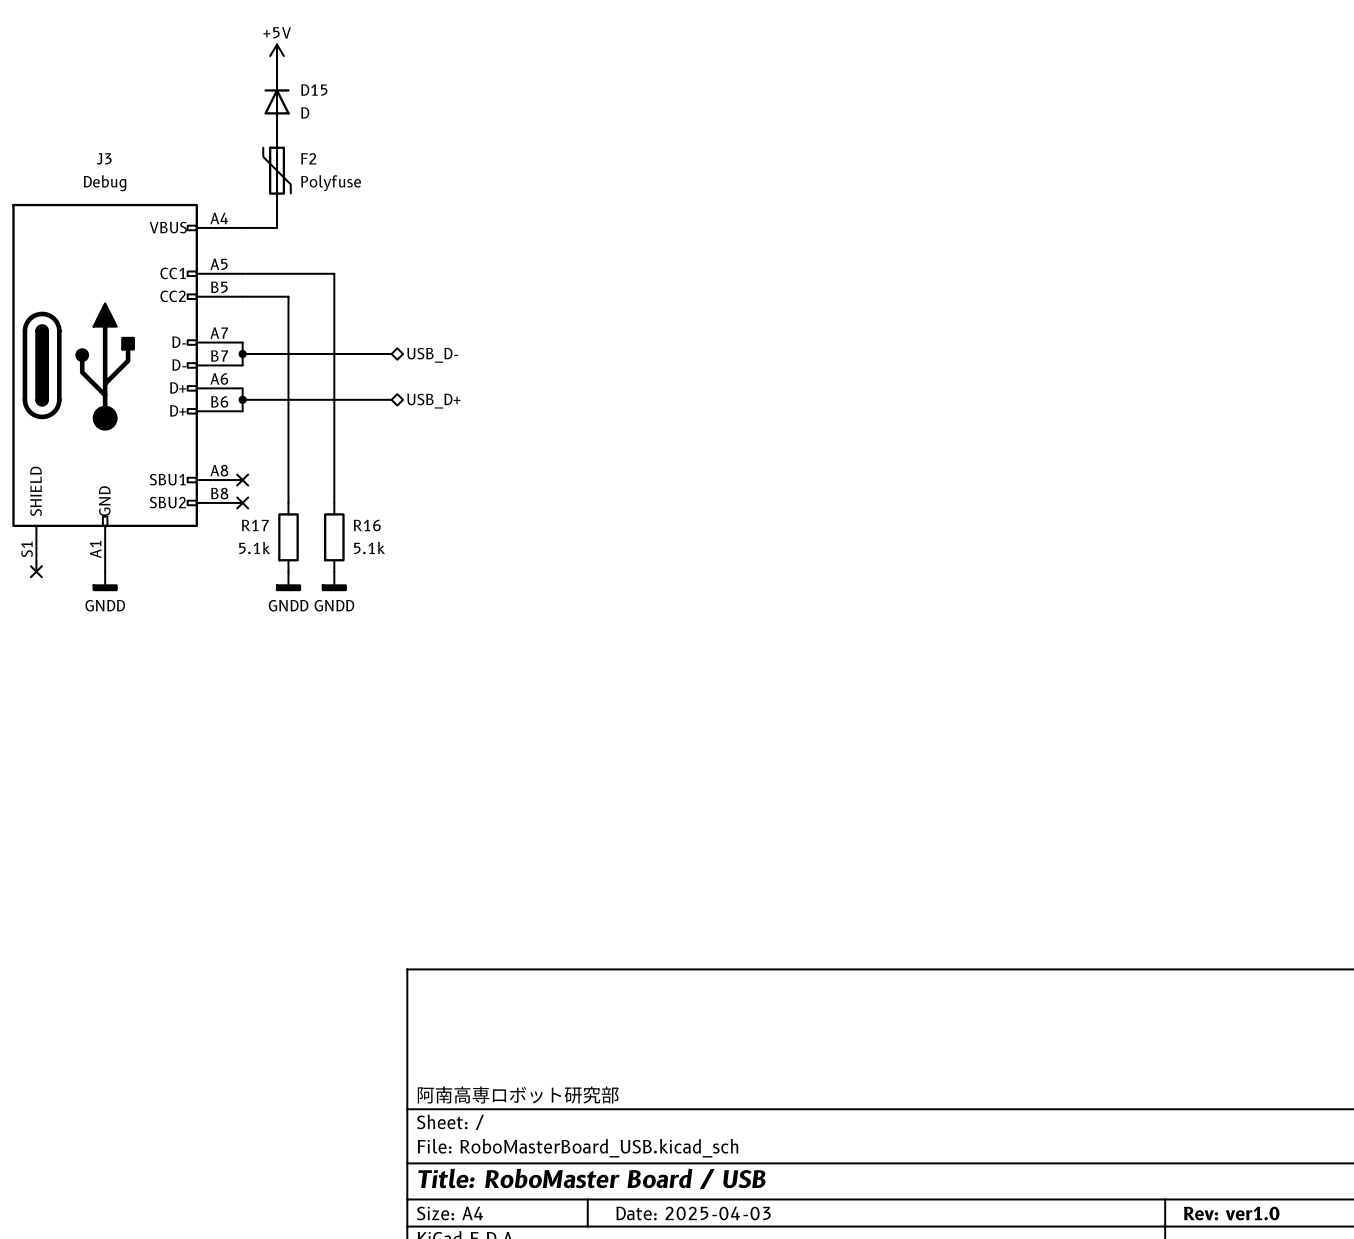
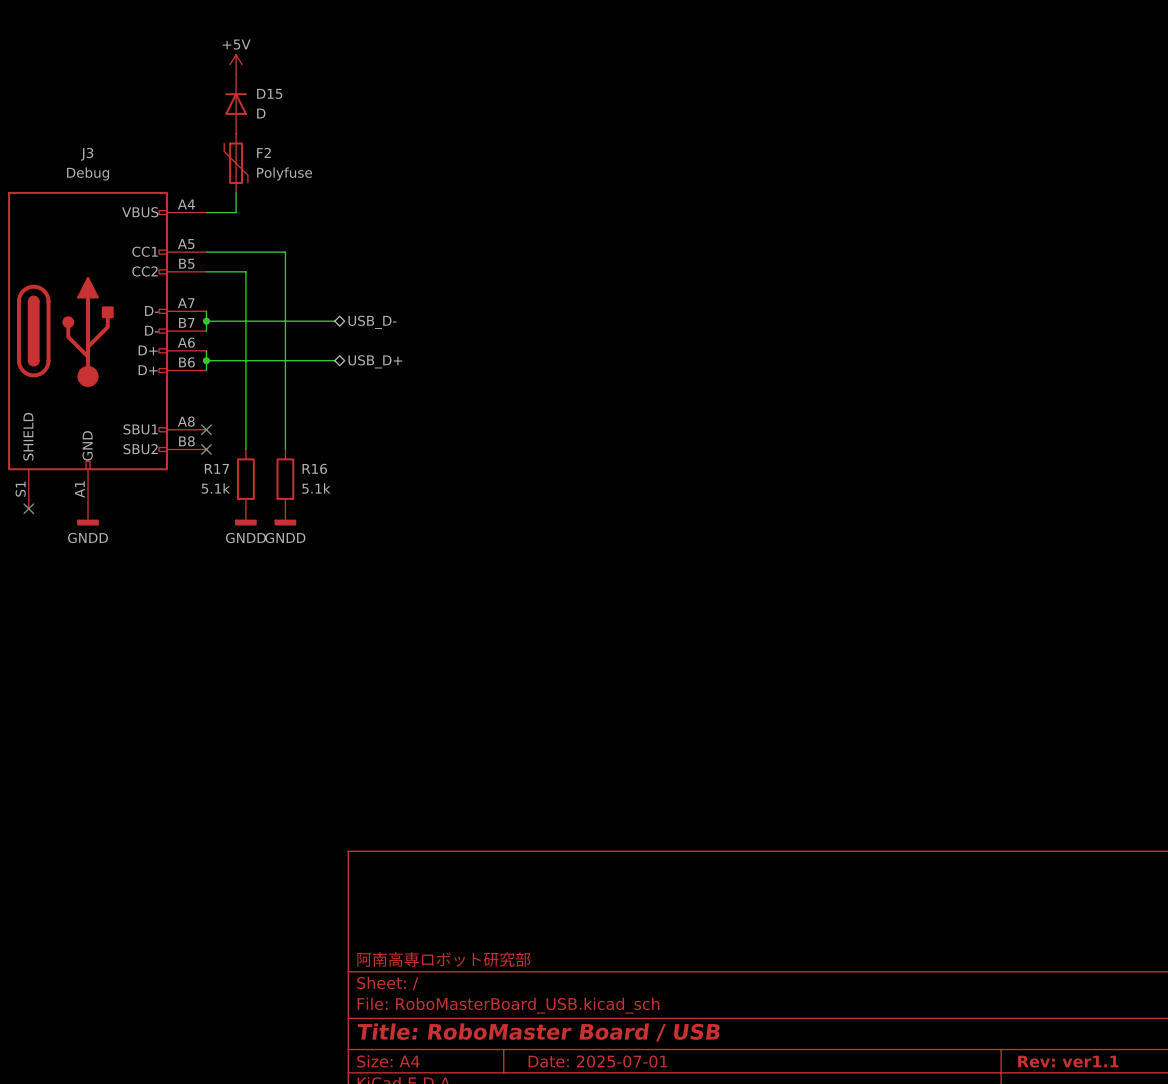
title block: Date: 2025-04-03 (693, 1213) -> Date: 2025-07-01 (597, 1061)
title block: Rev: ver1.0 (1231, 1213) -> Rev: ver1.1 (1068, 1061)

